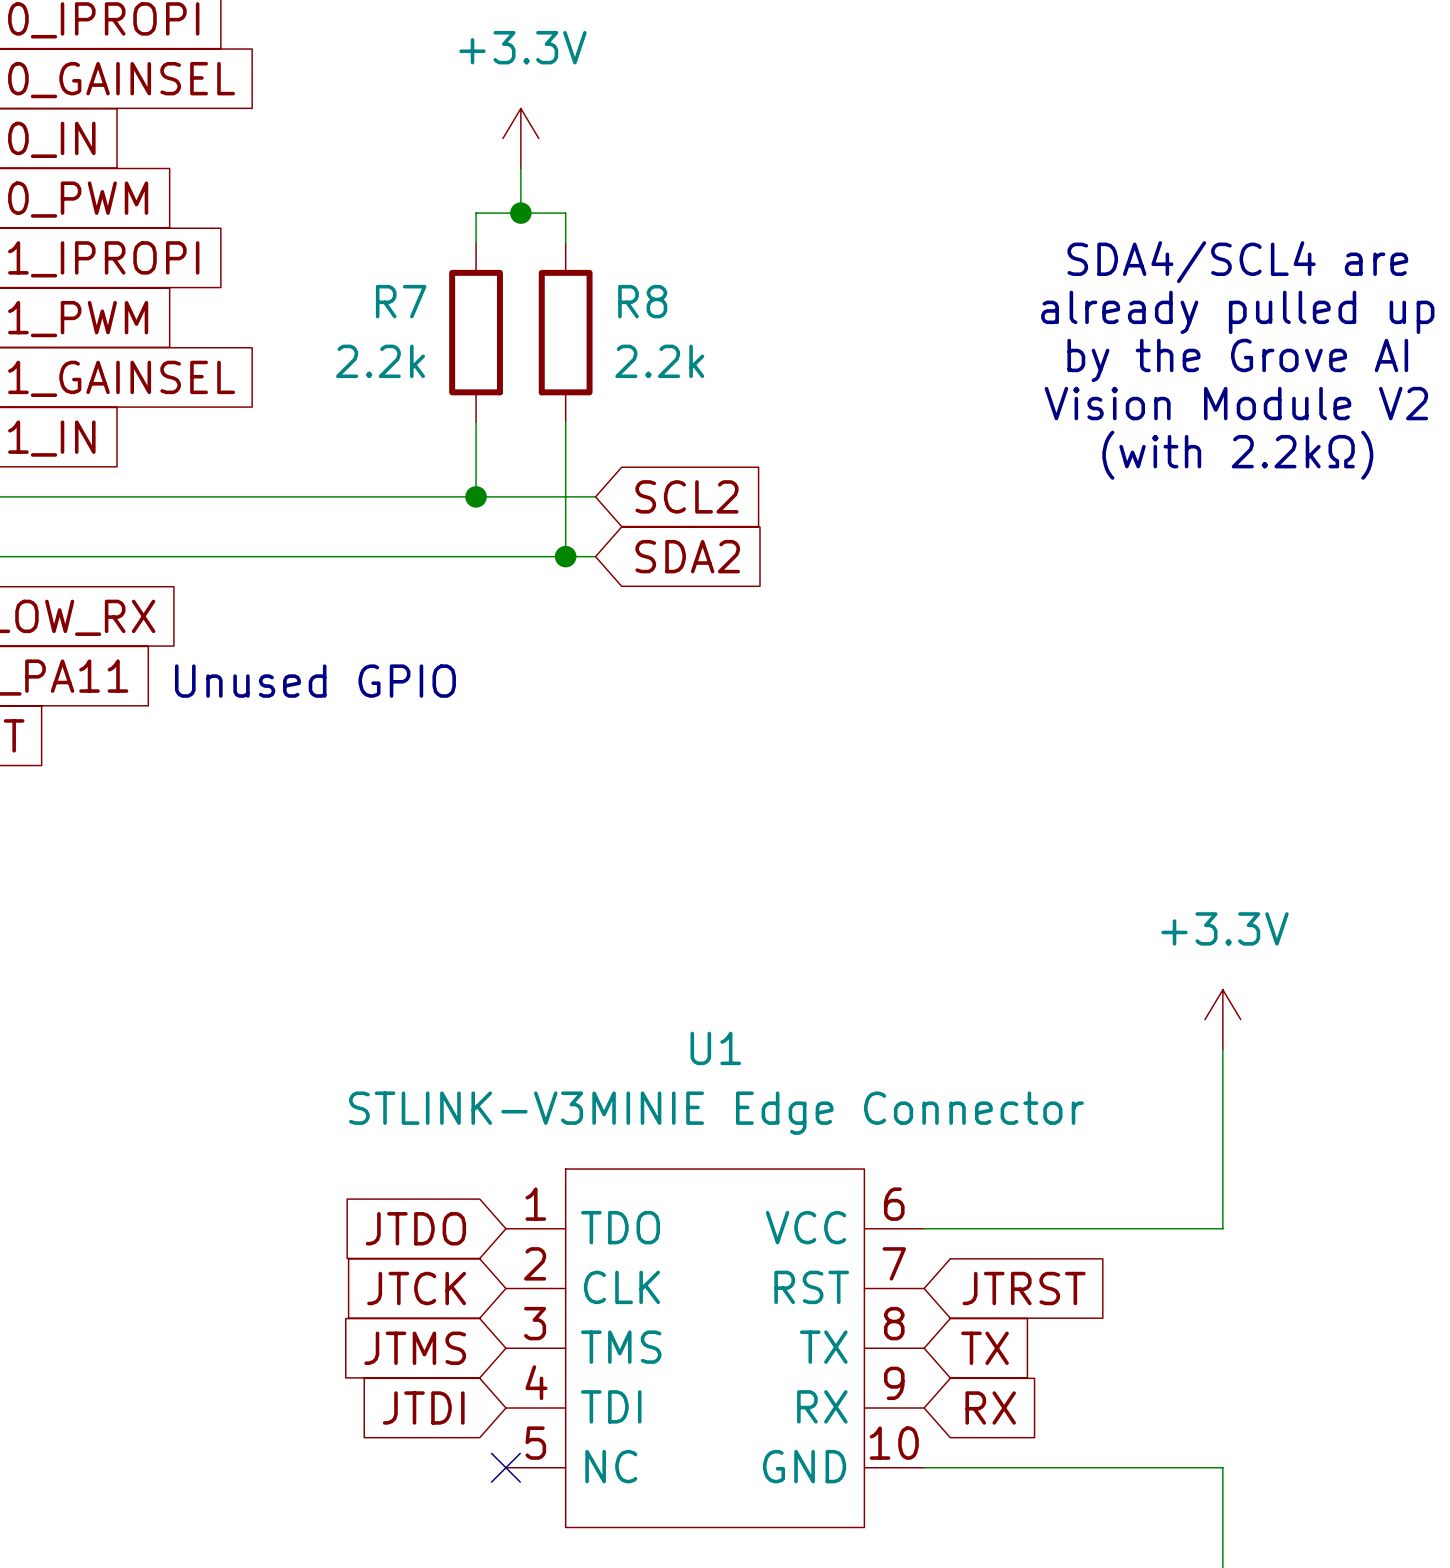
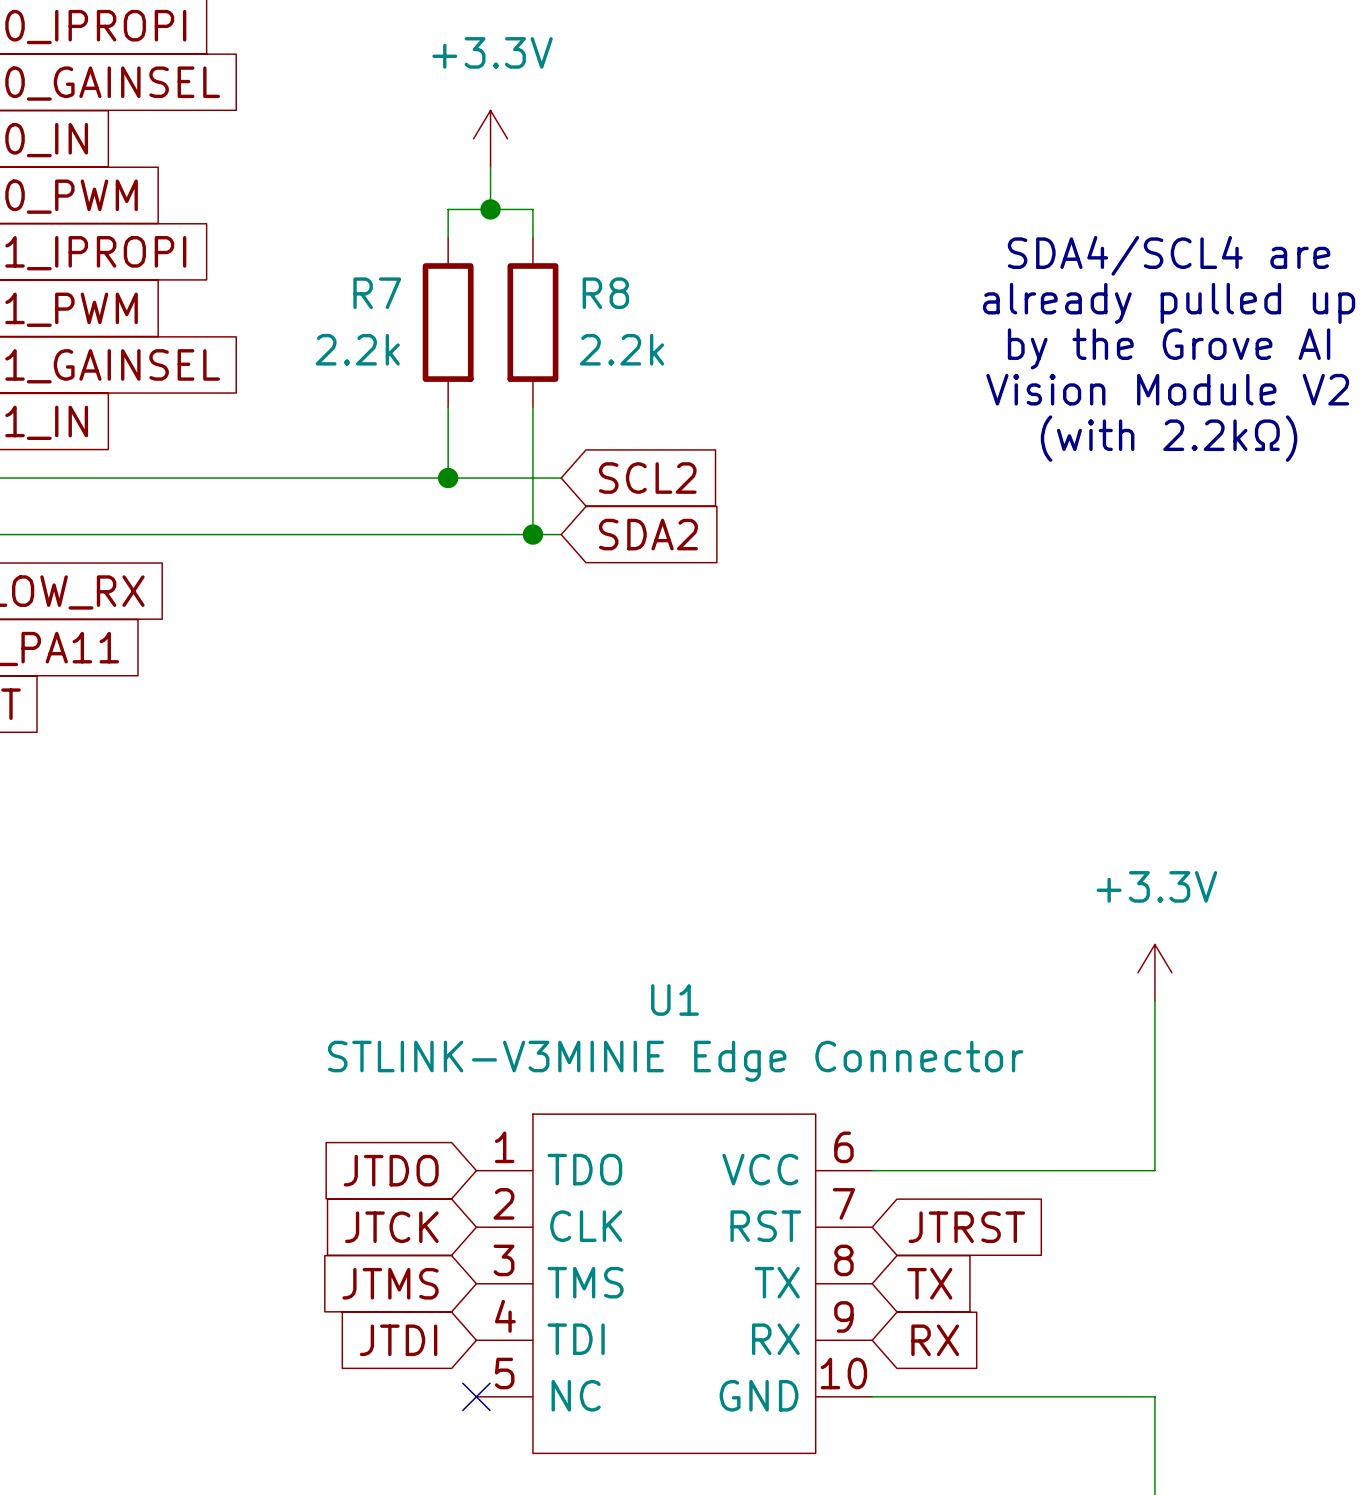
text: Unused GPIO (315, 681) -> none

